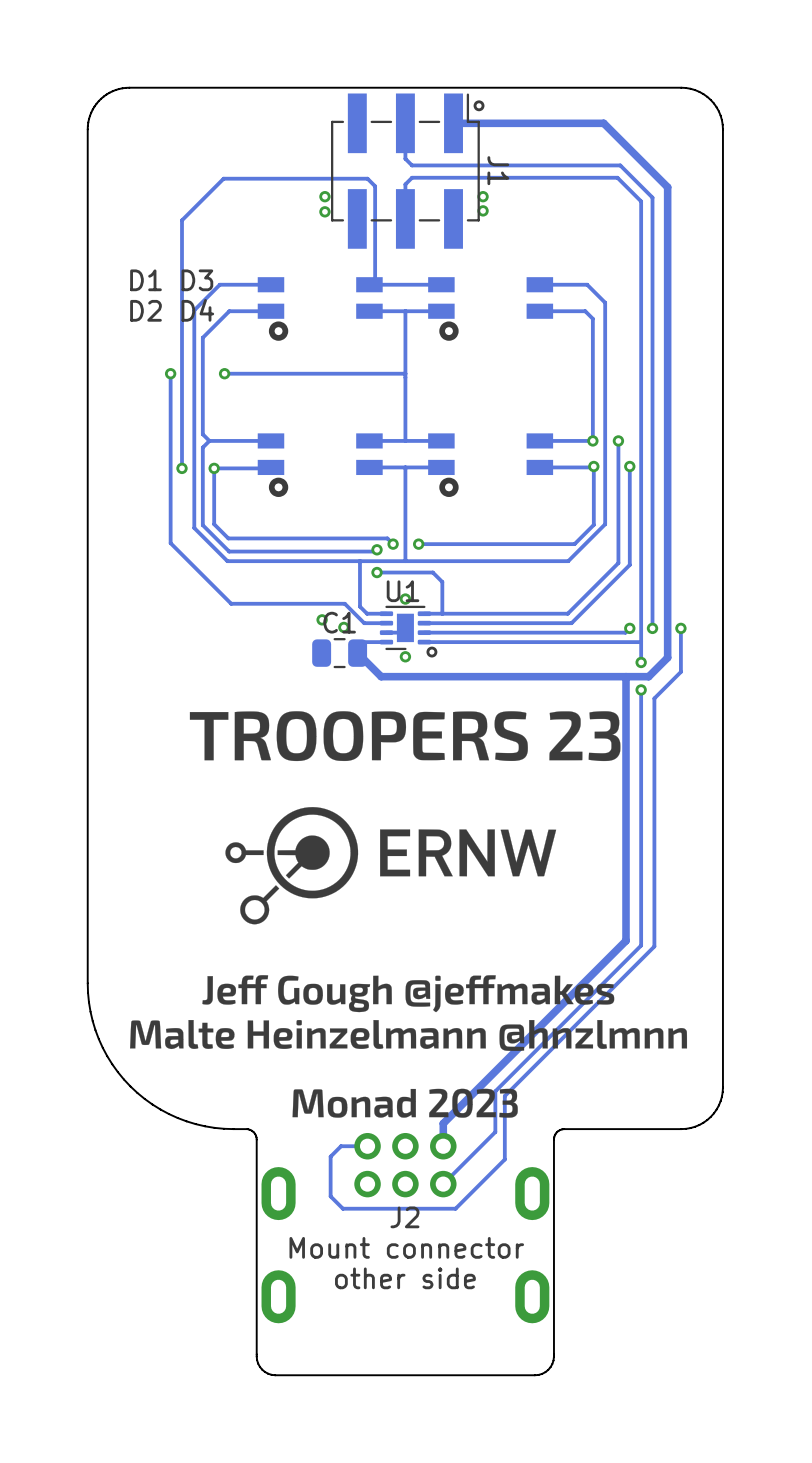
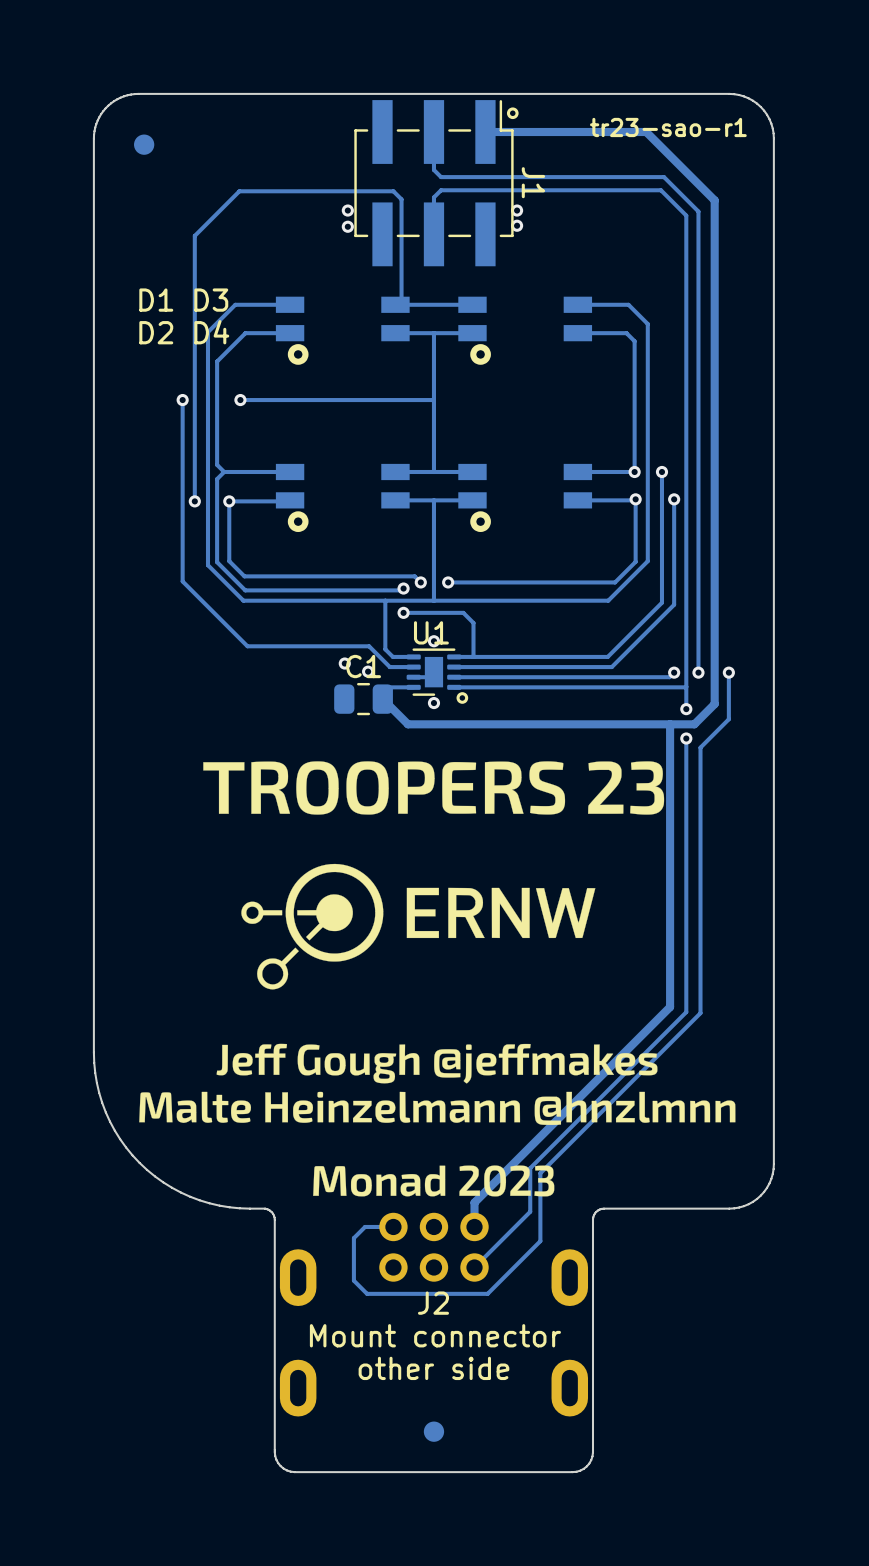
text: none -> tr23-sao-r1 (668, 127)
part: none -> (144, 144)
part: none -> (433, 1431)

